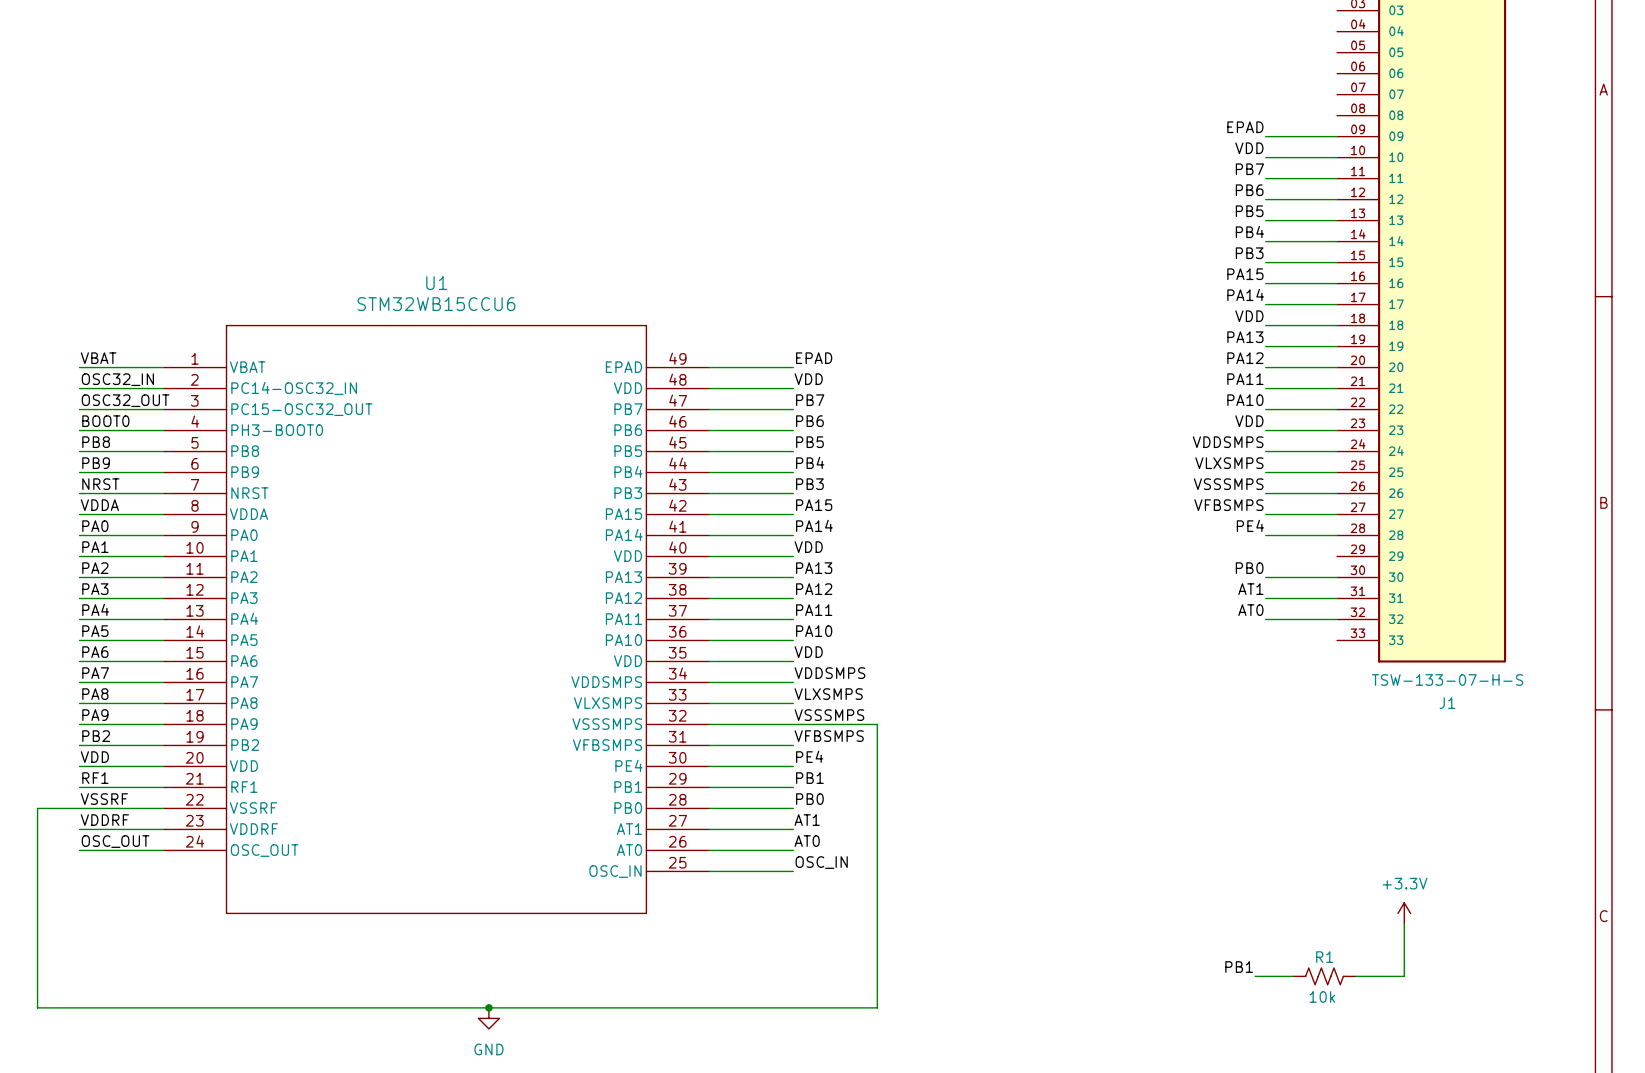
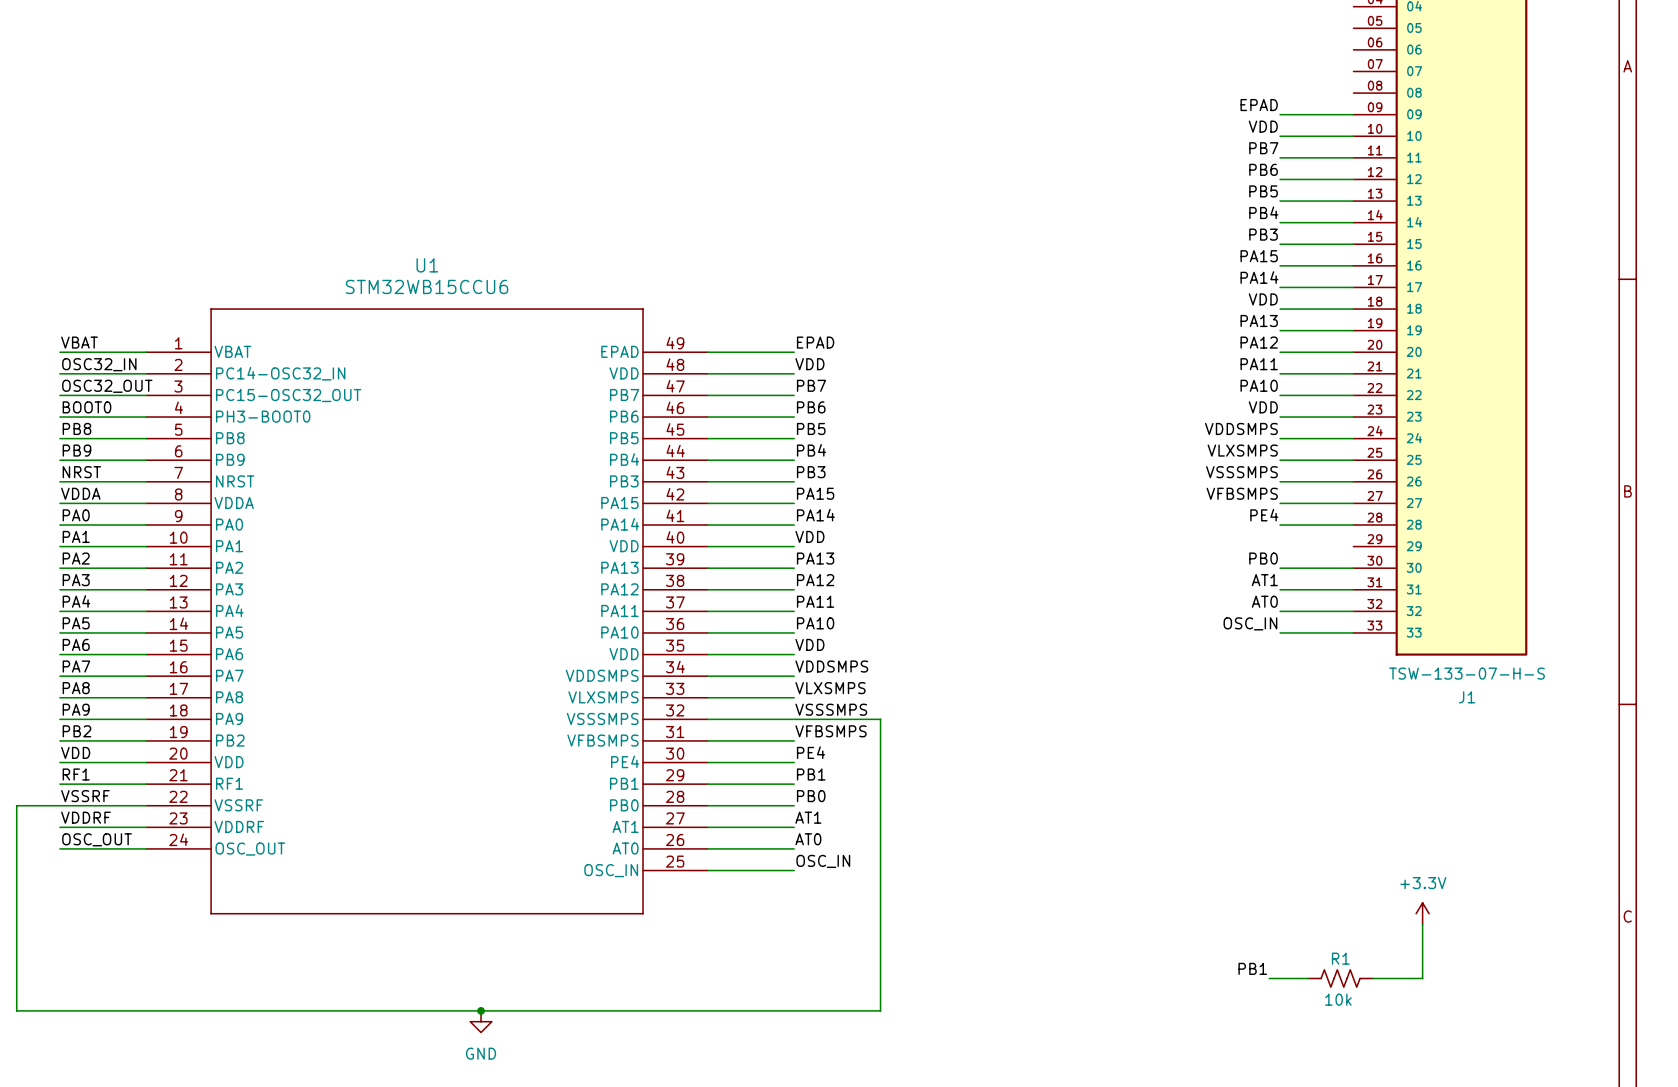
label: none -> OSC_IN (1250, 623)
wire: none -> (1280, 632) (1353, 632)

